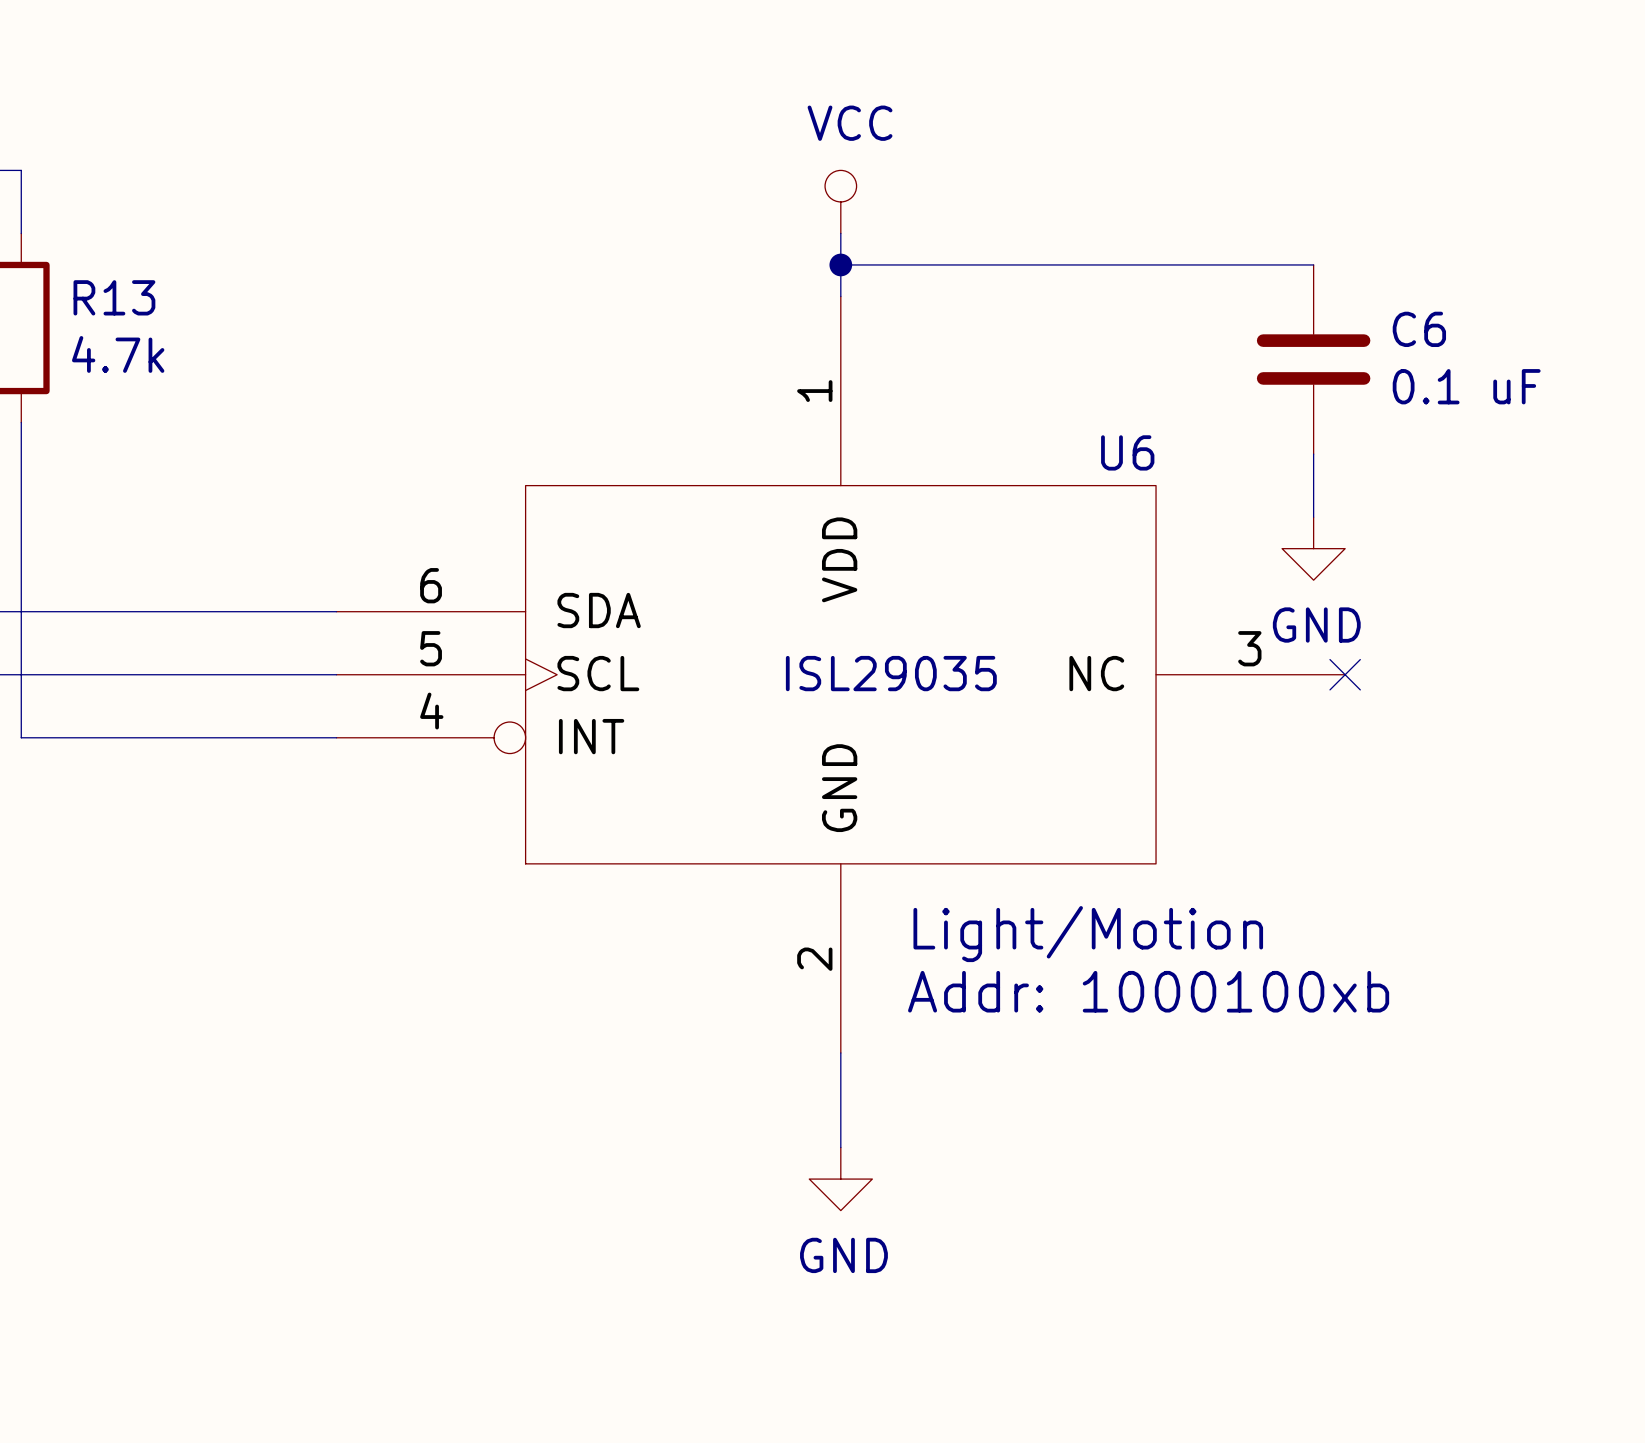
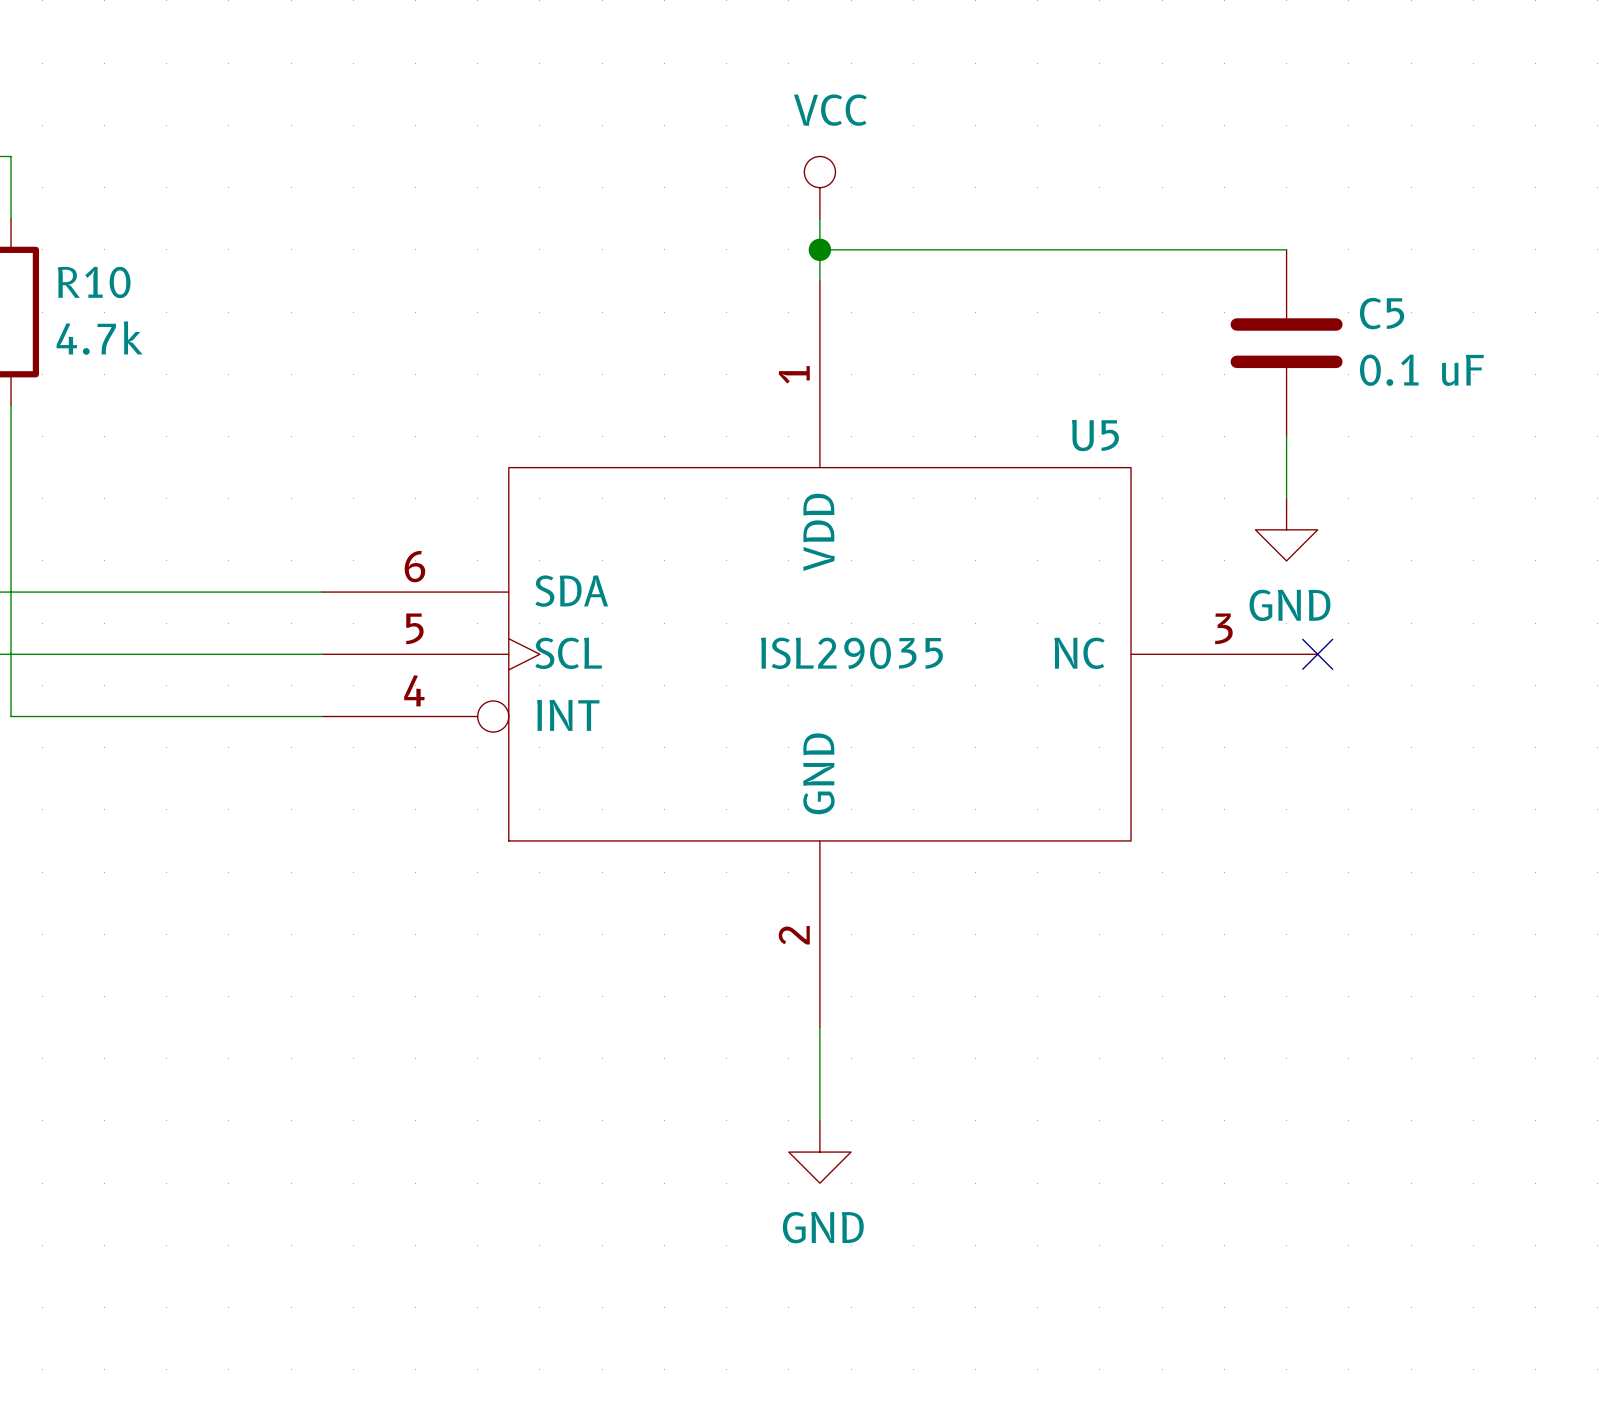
R13 name: R13 (114, 297) -> R10 (94, 282)
C6 name: C6 (1419, 329) -> C5 (1382, 313)
U6 name: U6 (1127, 452) -> U5 (1095, 435)
text: Light/Motion (1088, 934) -> none
text: Addr: 1000100xb (1148, 991) -> none

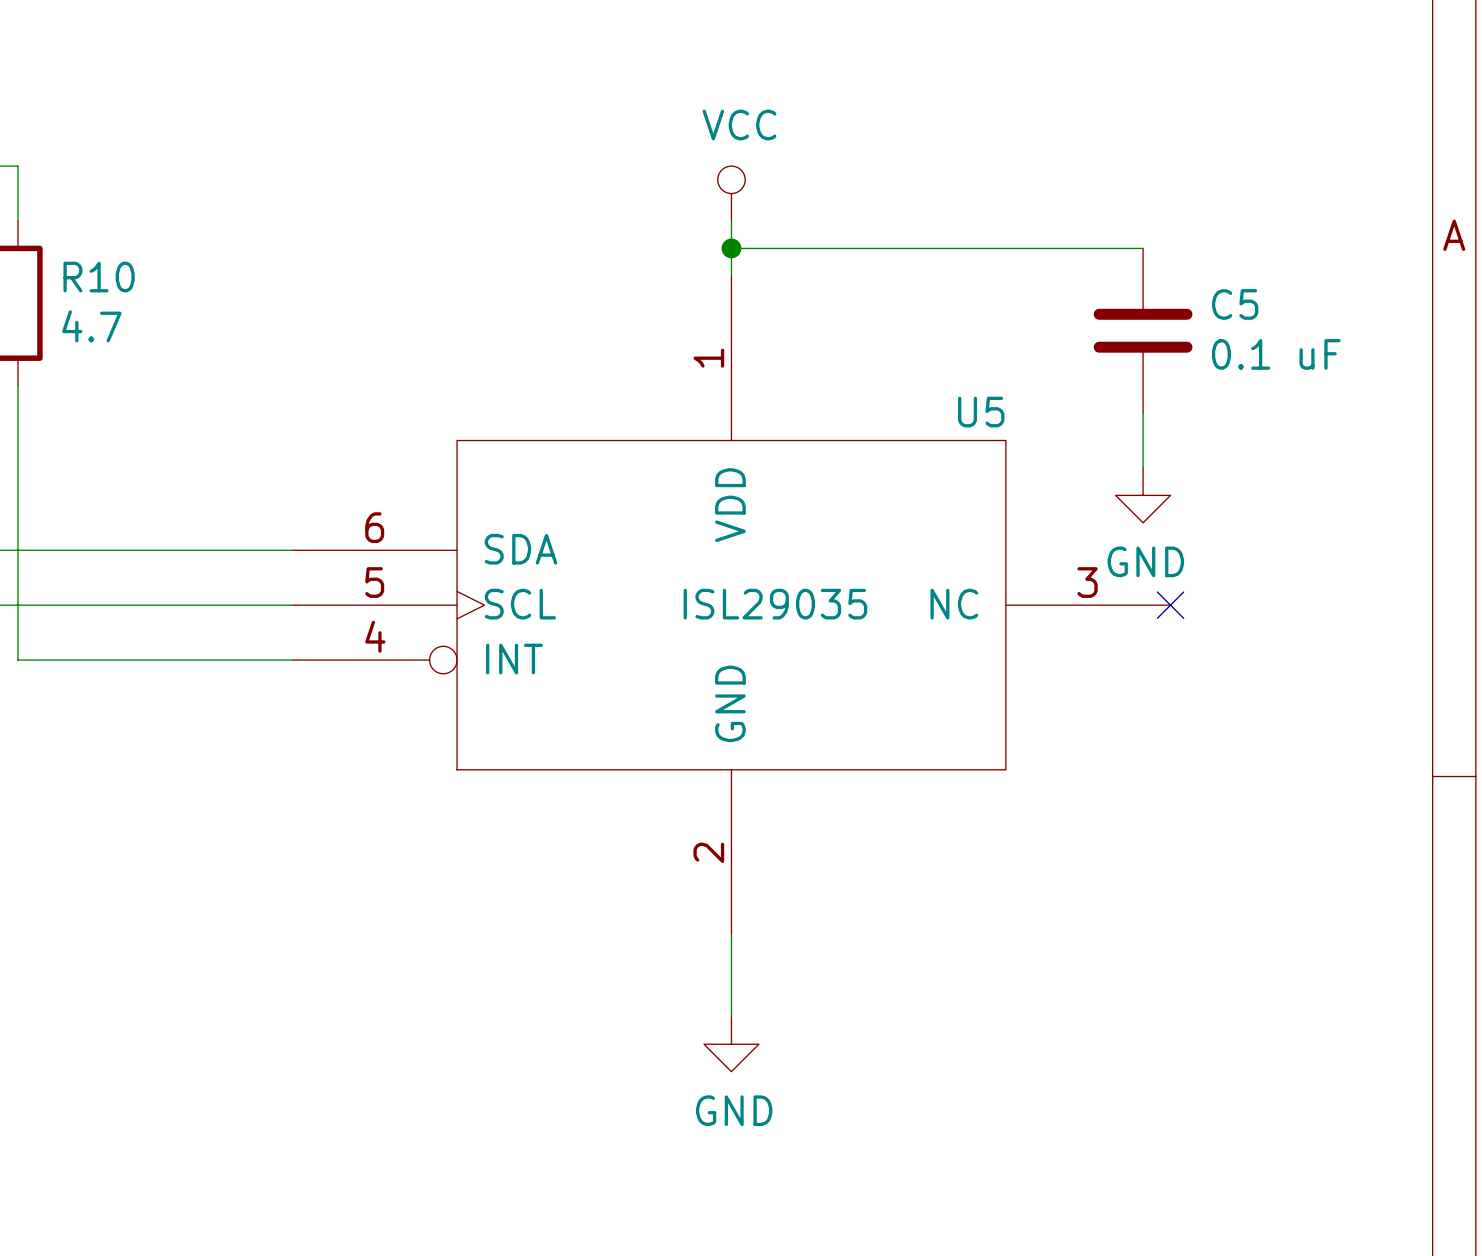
R10 value: 4.7k (99, 338) -> 4.7 (91, 326)

